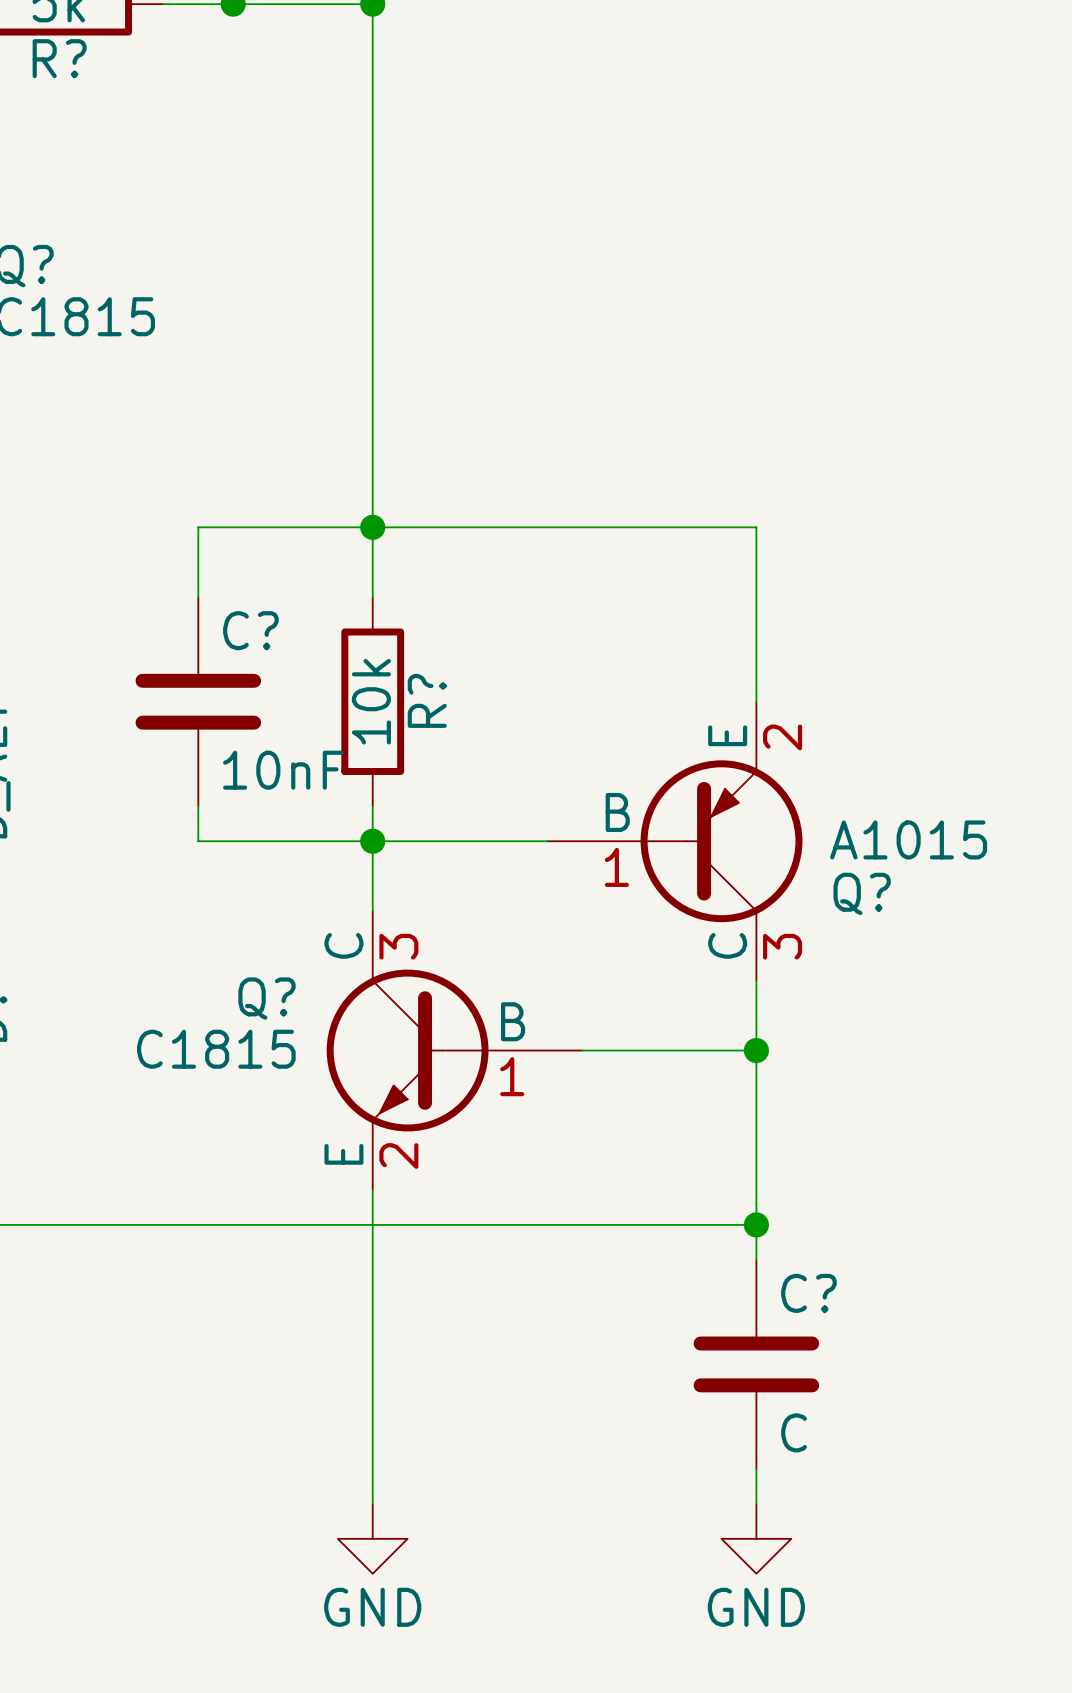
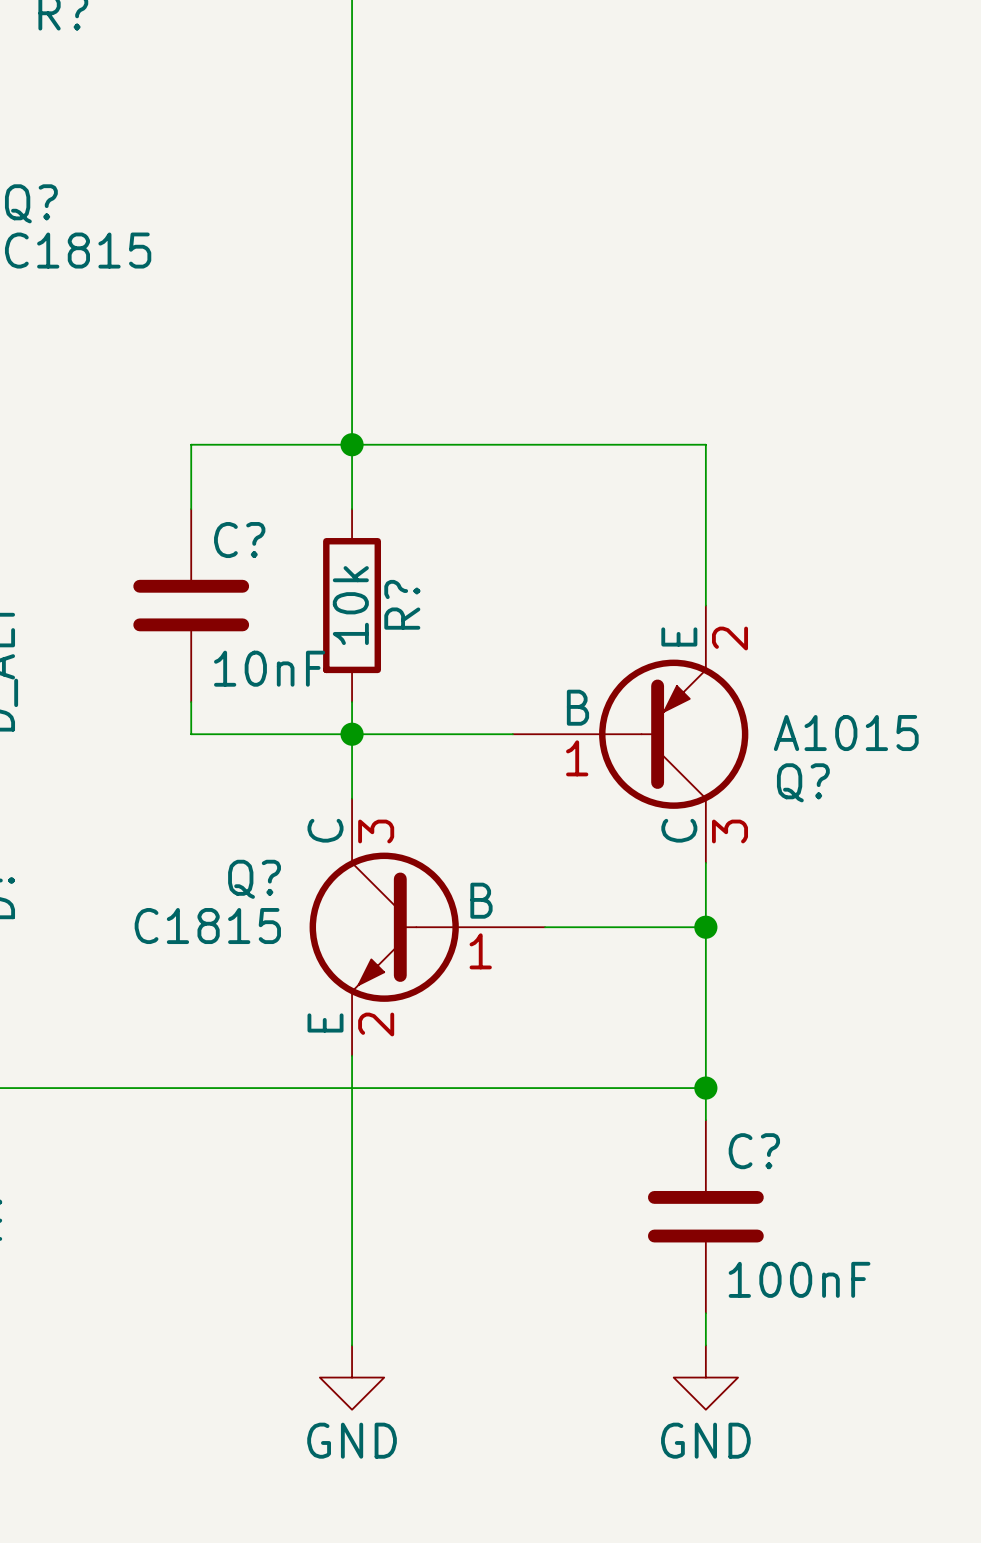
C? value: C (794, 1432) -> 100nF (799, 1279)

